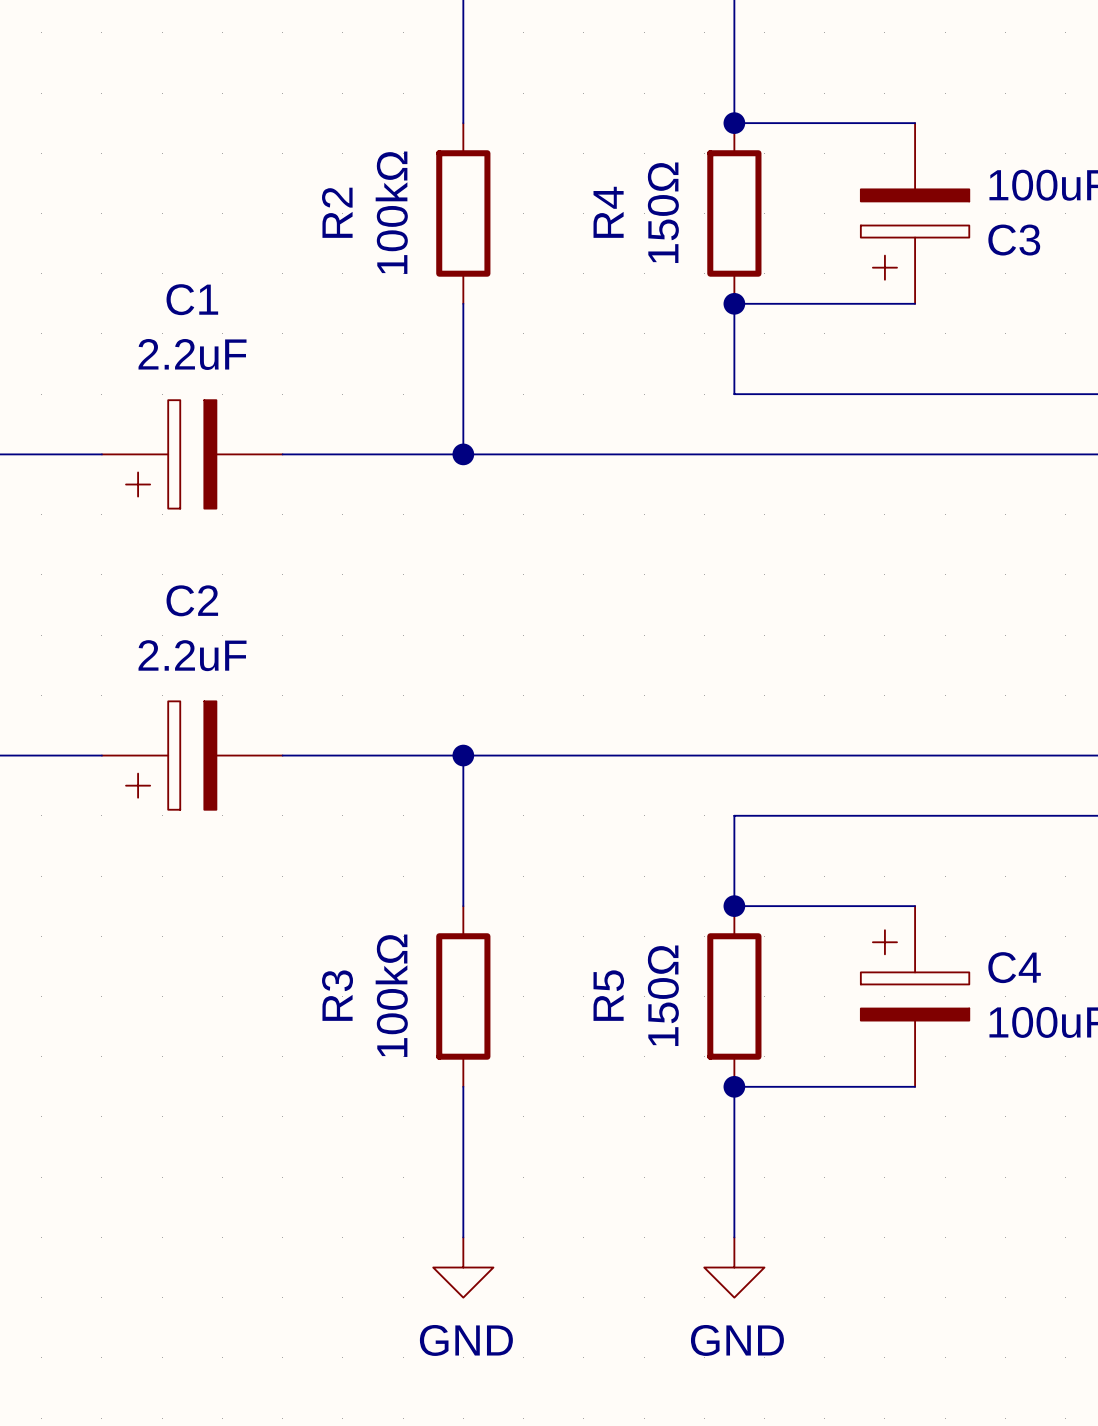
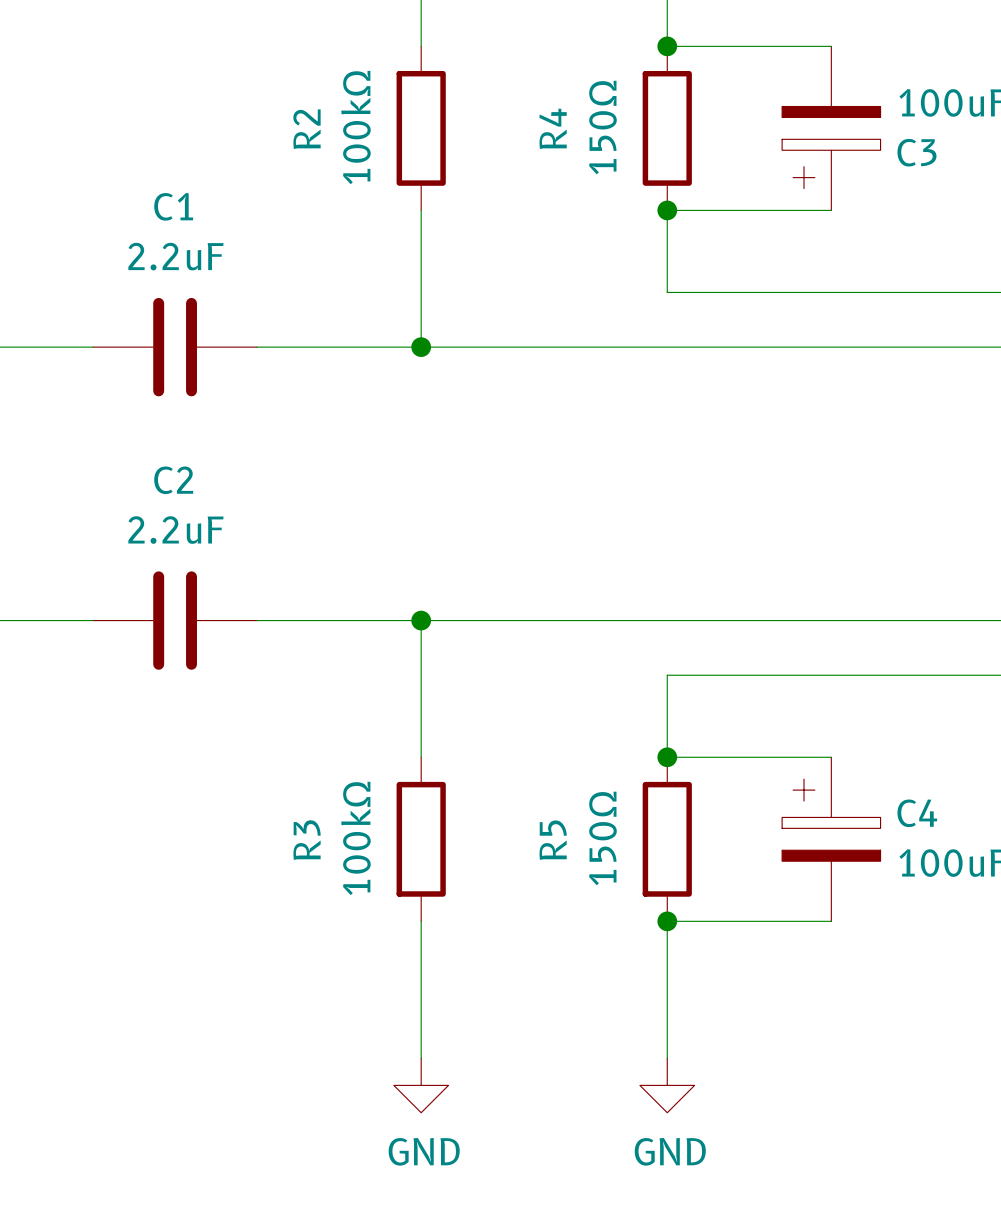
C1 symbol: [101, 400, 283, 509] -> [93, 297, 258, 397]
C2 symbol: [101, 701, 283, 810] -> [93, 571, 258, 670]

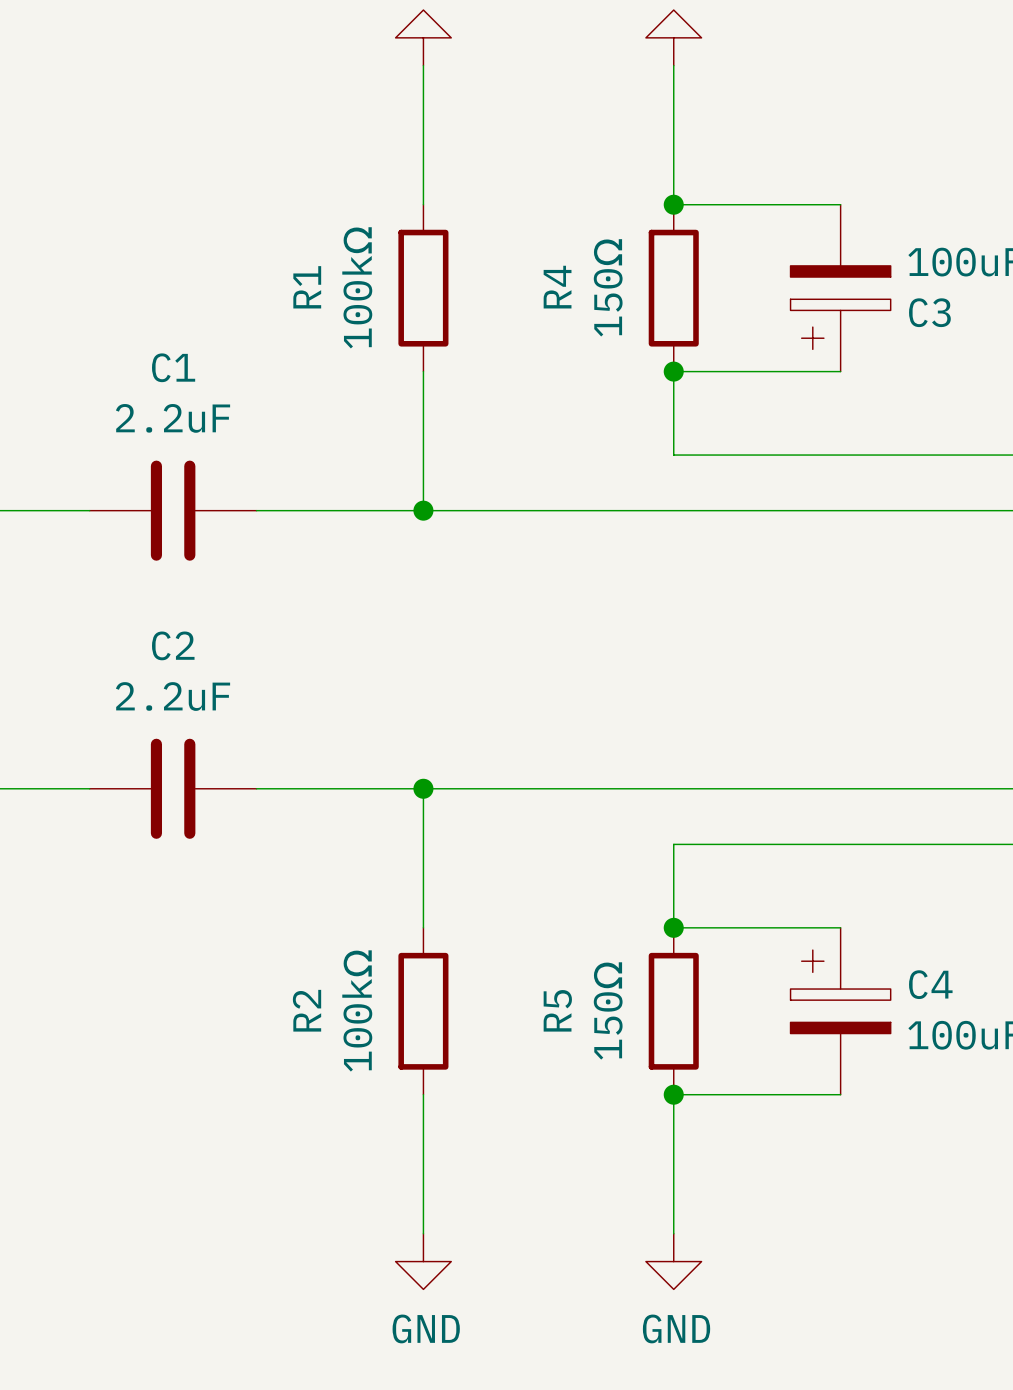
R2 name: R2 (306, 129) -> R1 (307, 287)
R3 name: R3 (307, 840) -> R2 (307, 1010)

